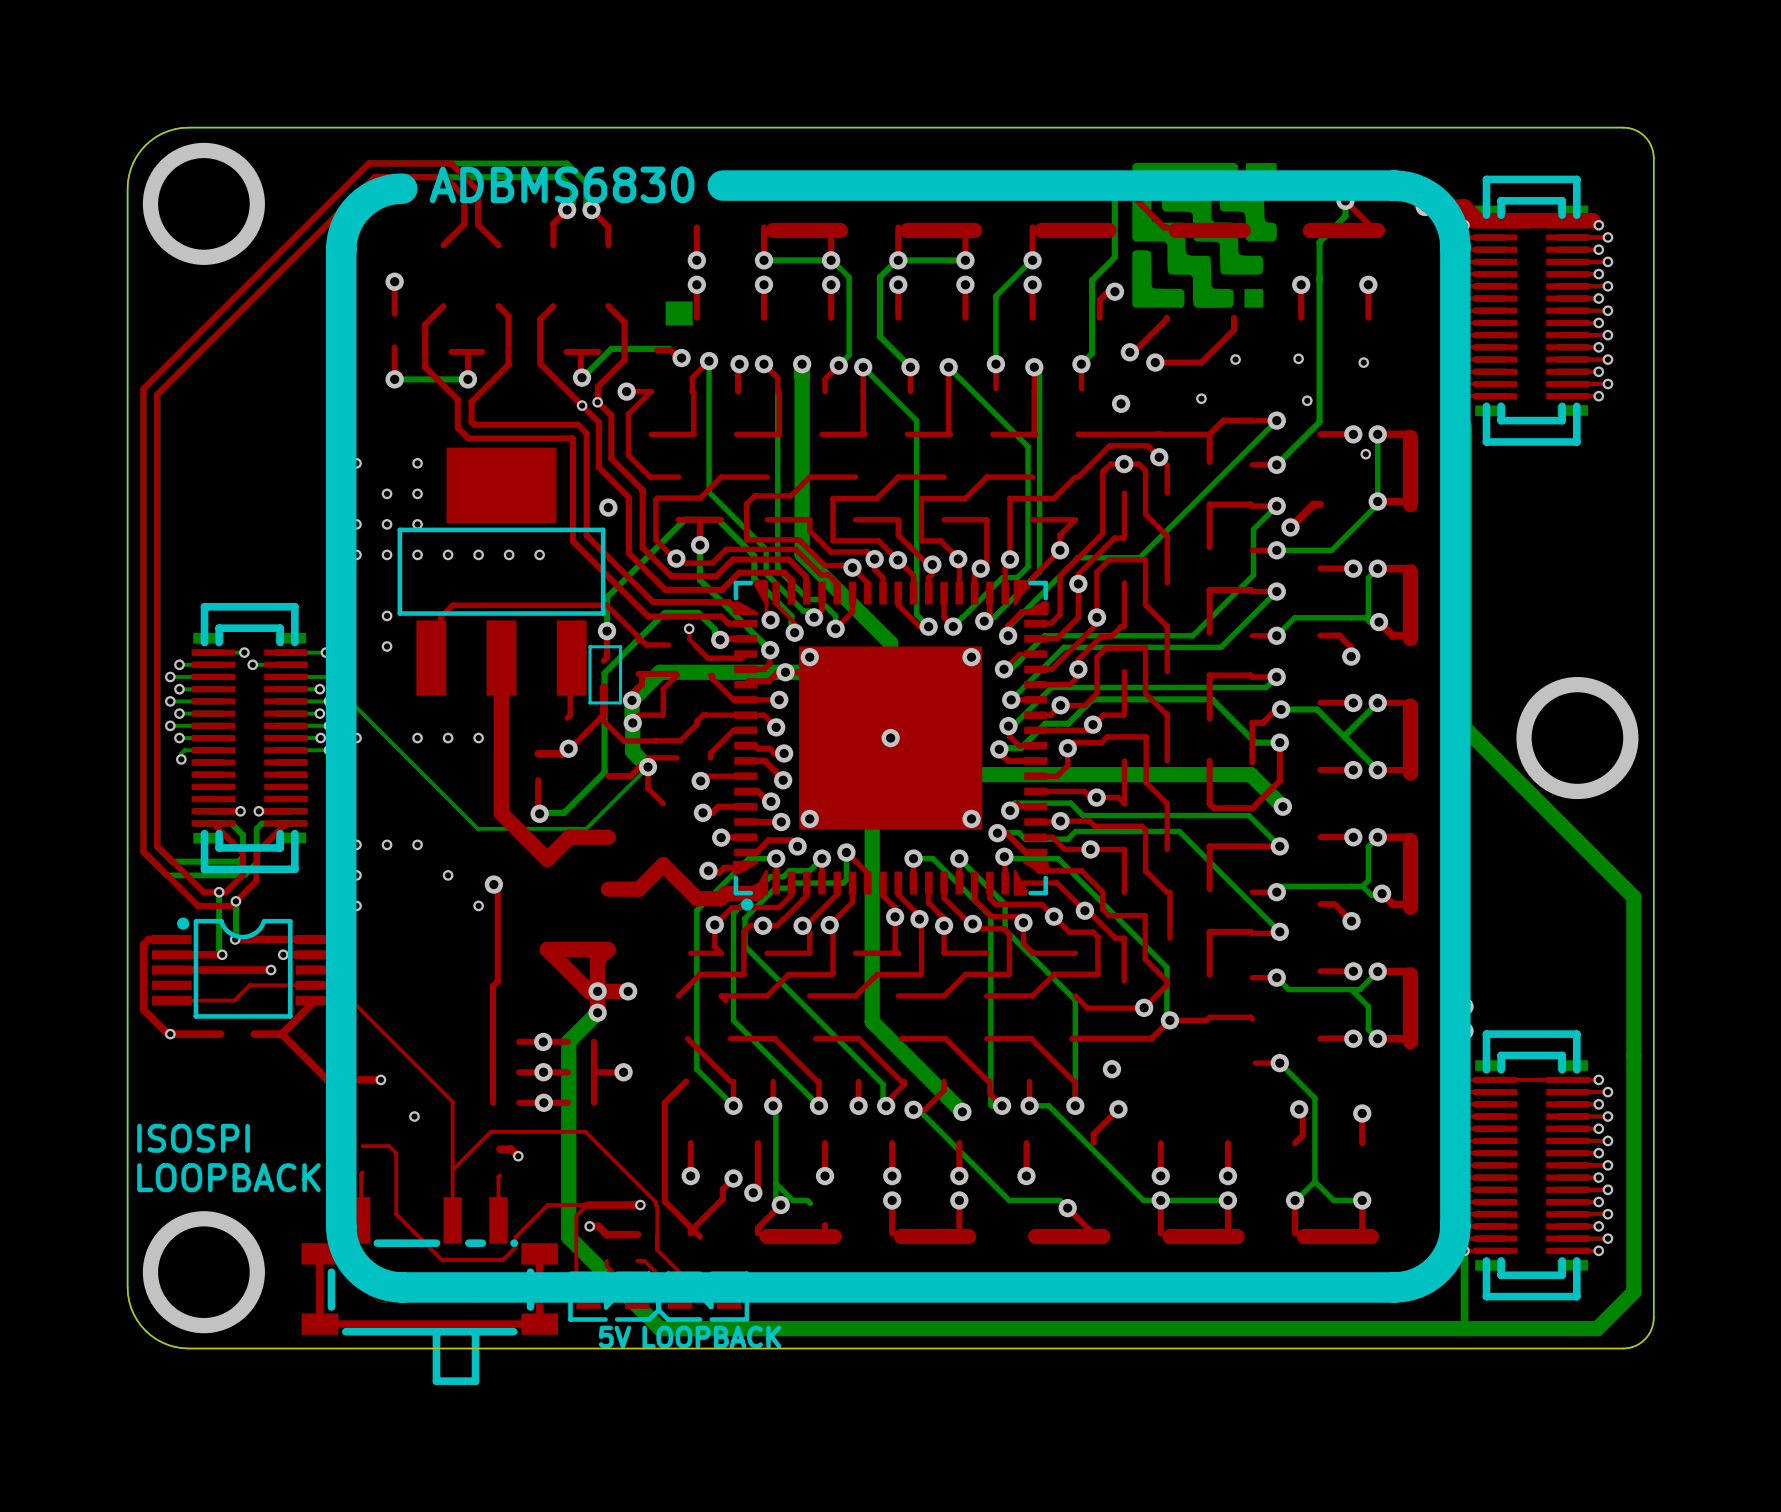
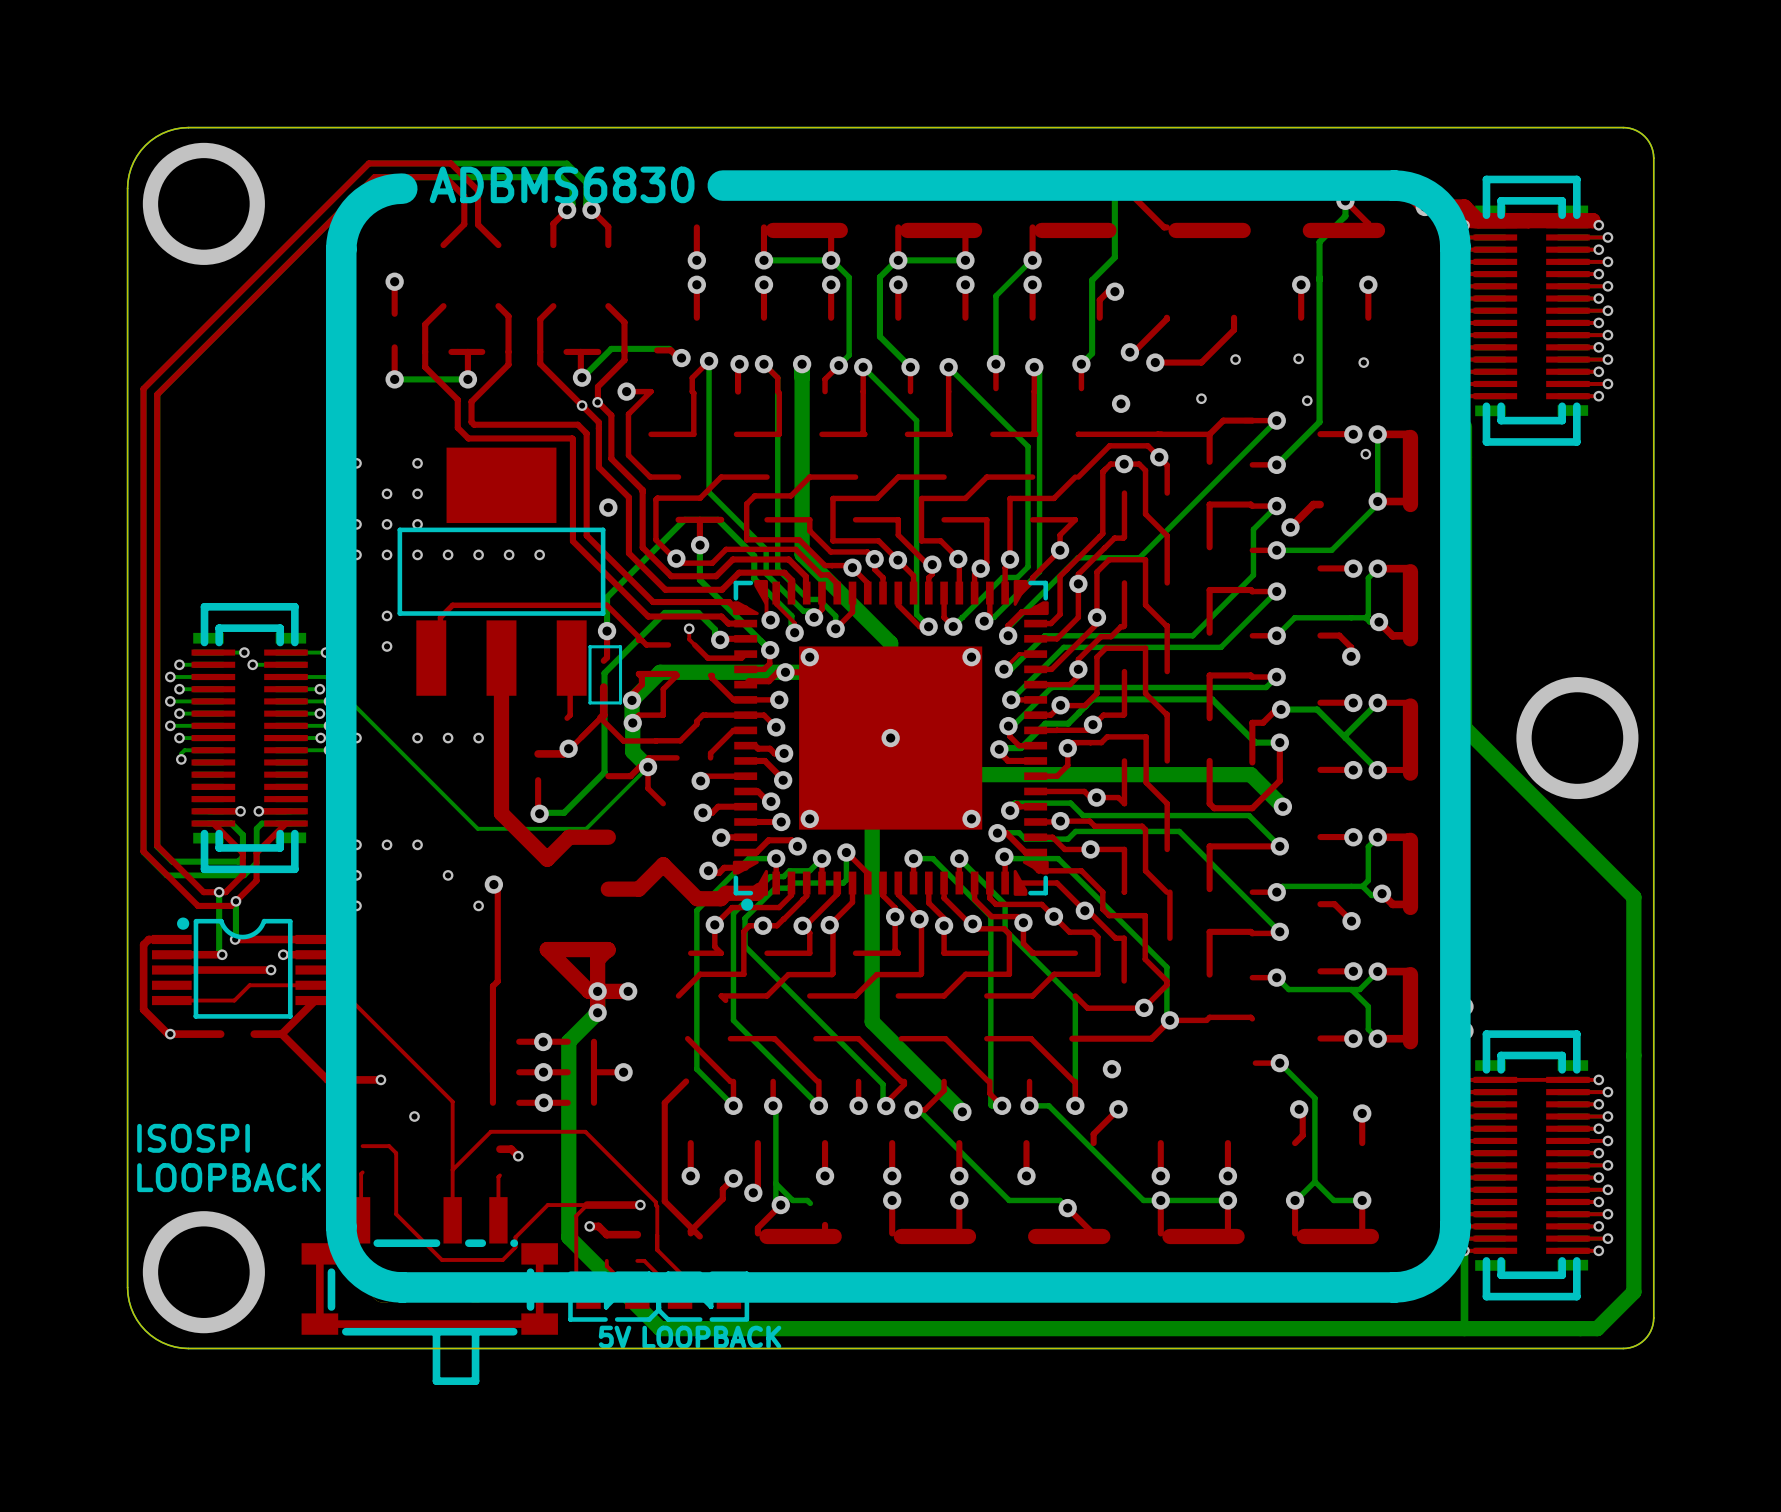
drawing: [665, 162, 1277, 326] -> none

